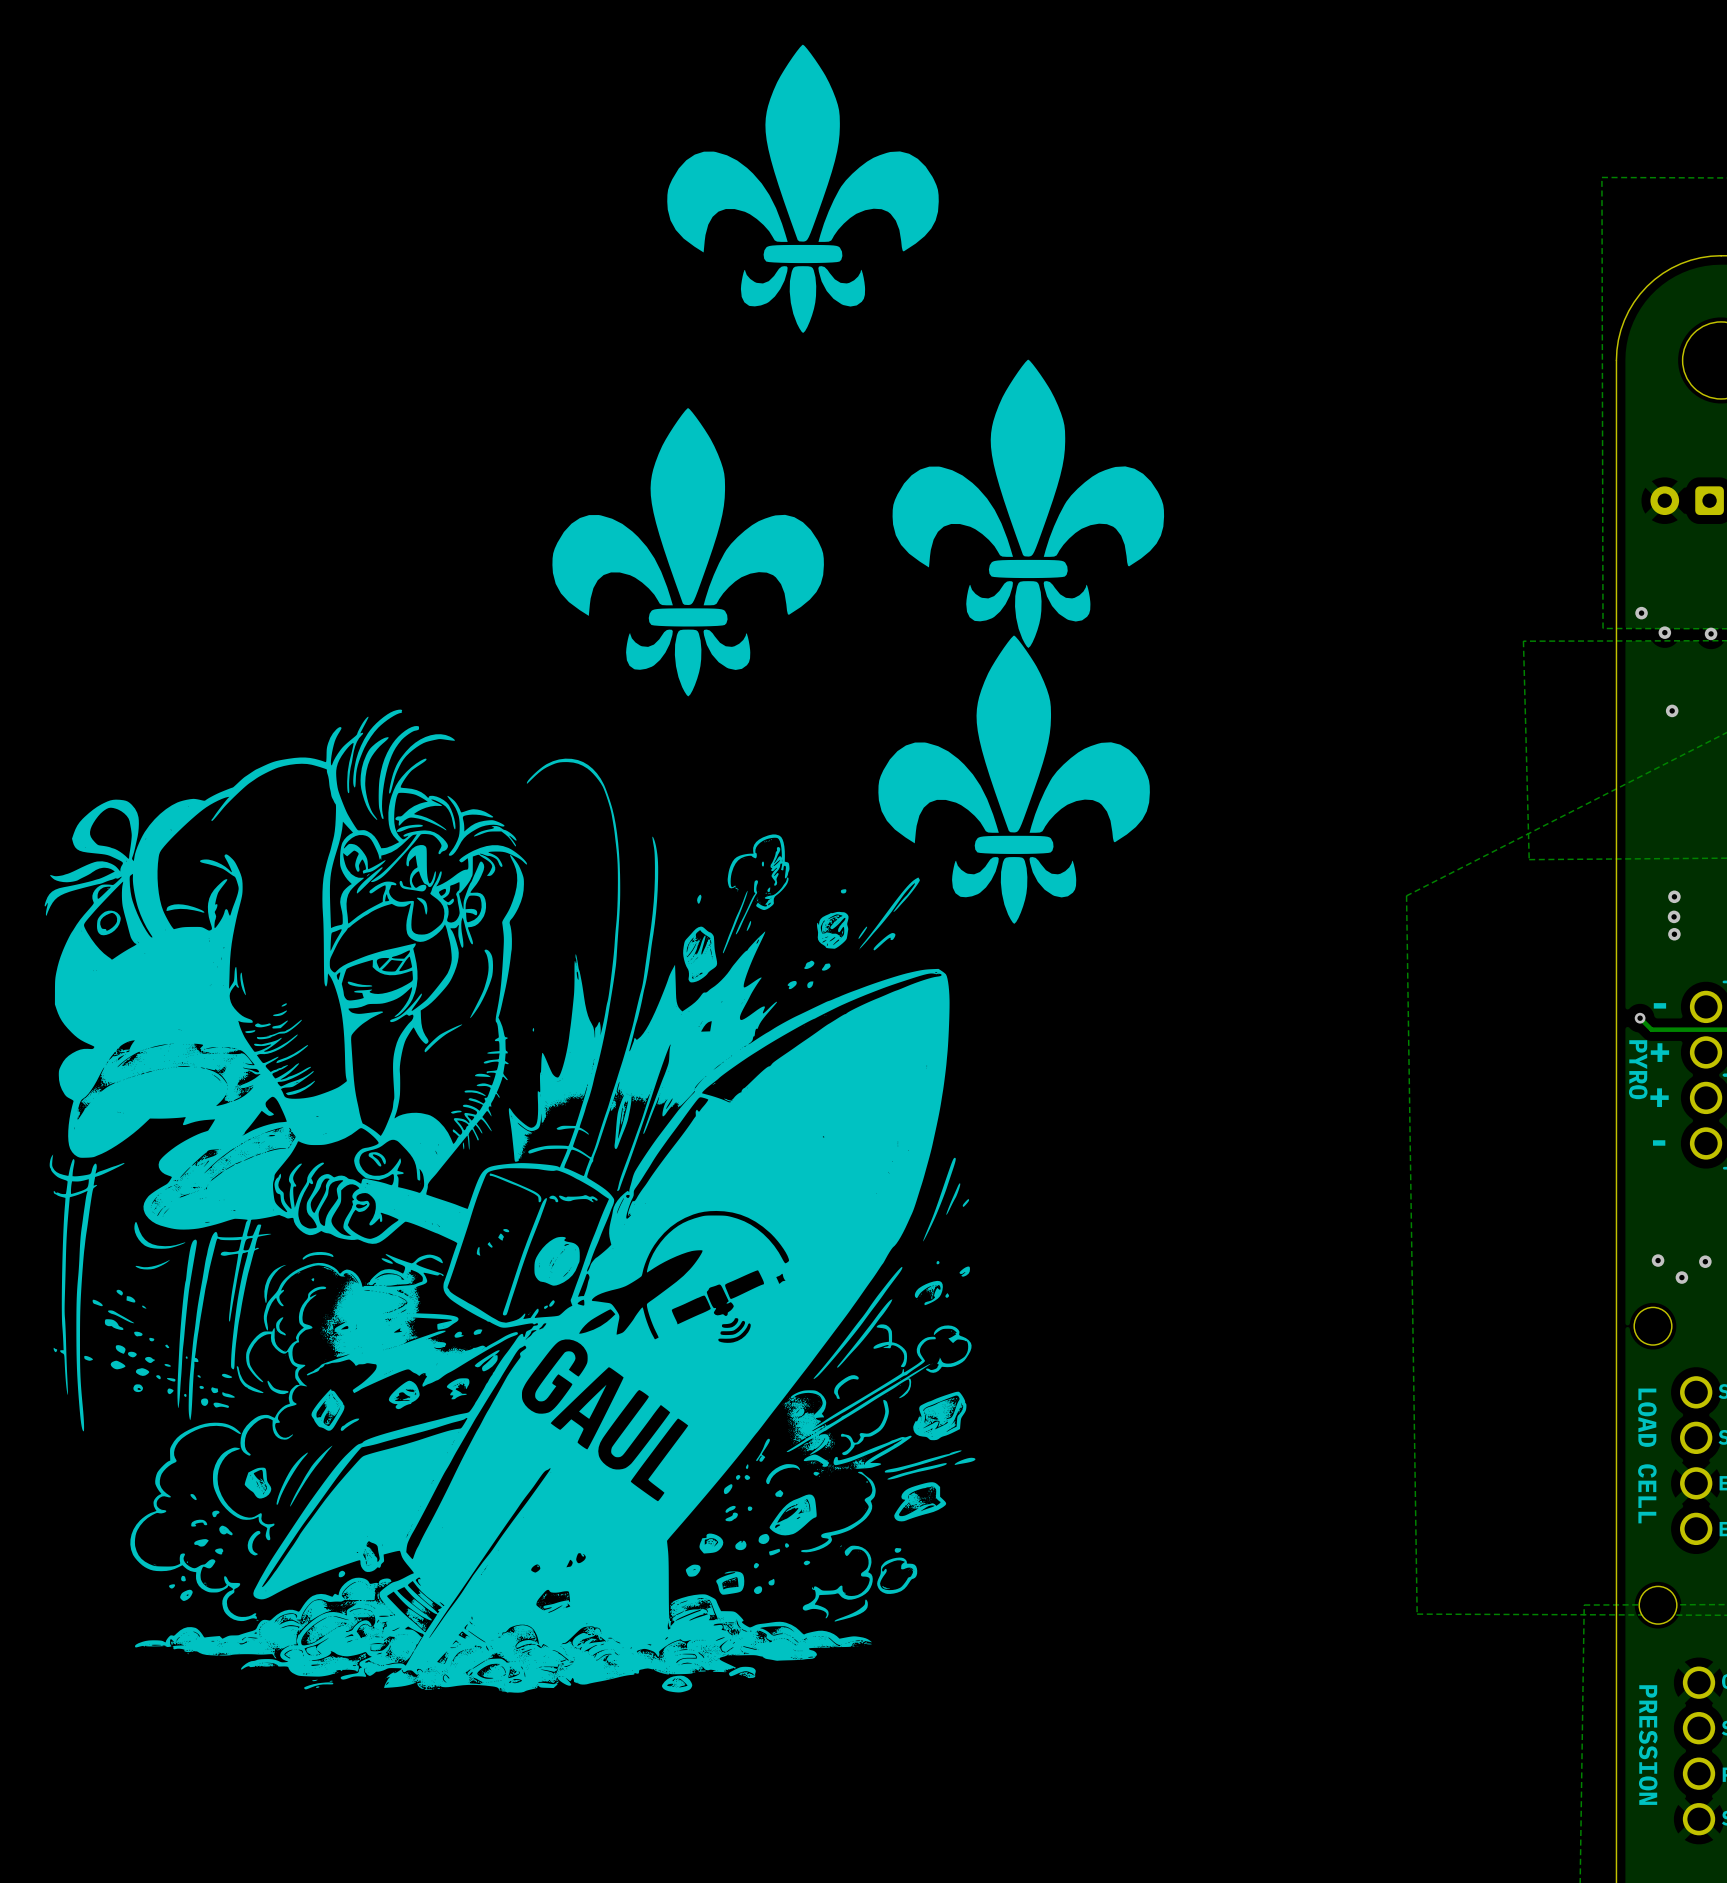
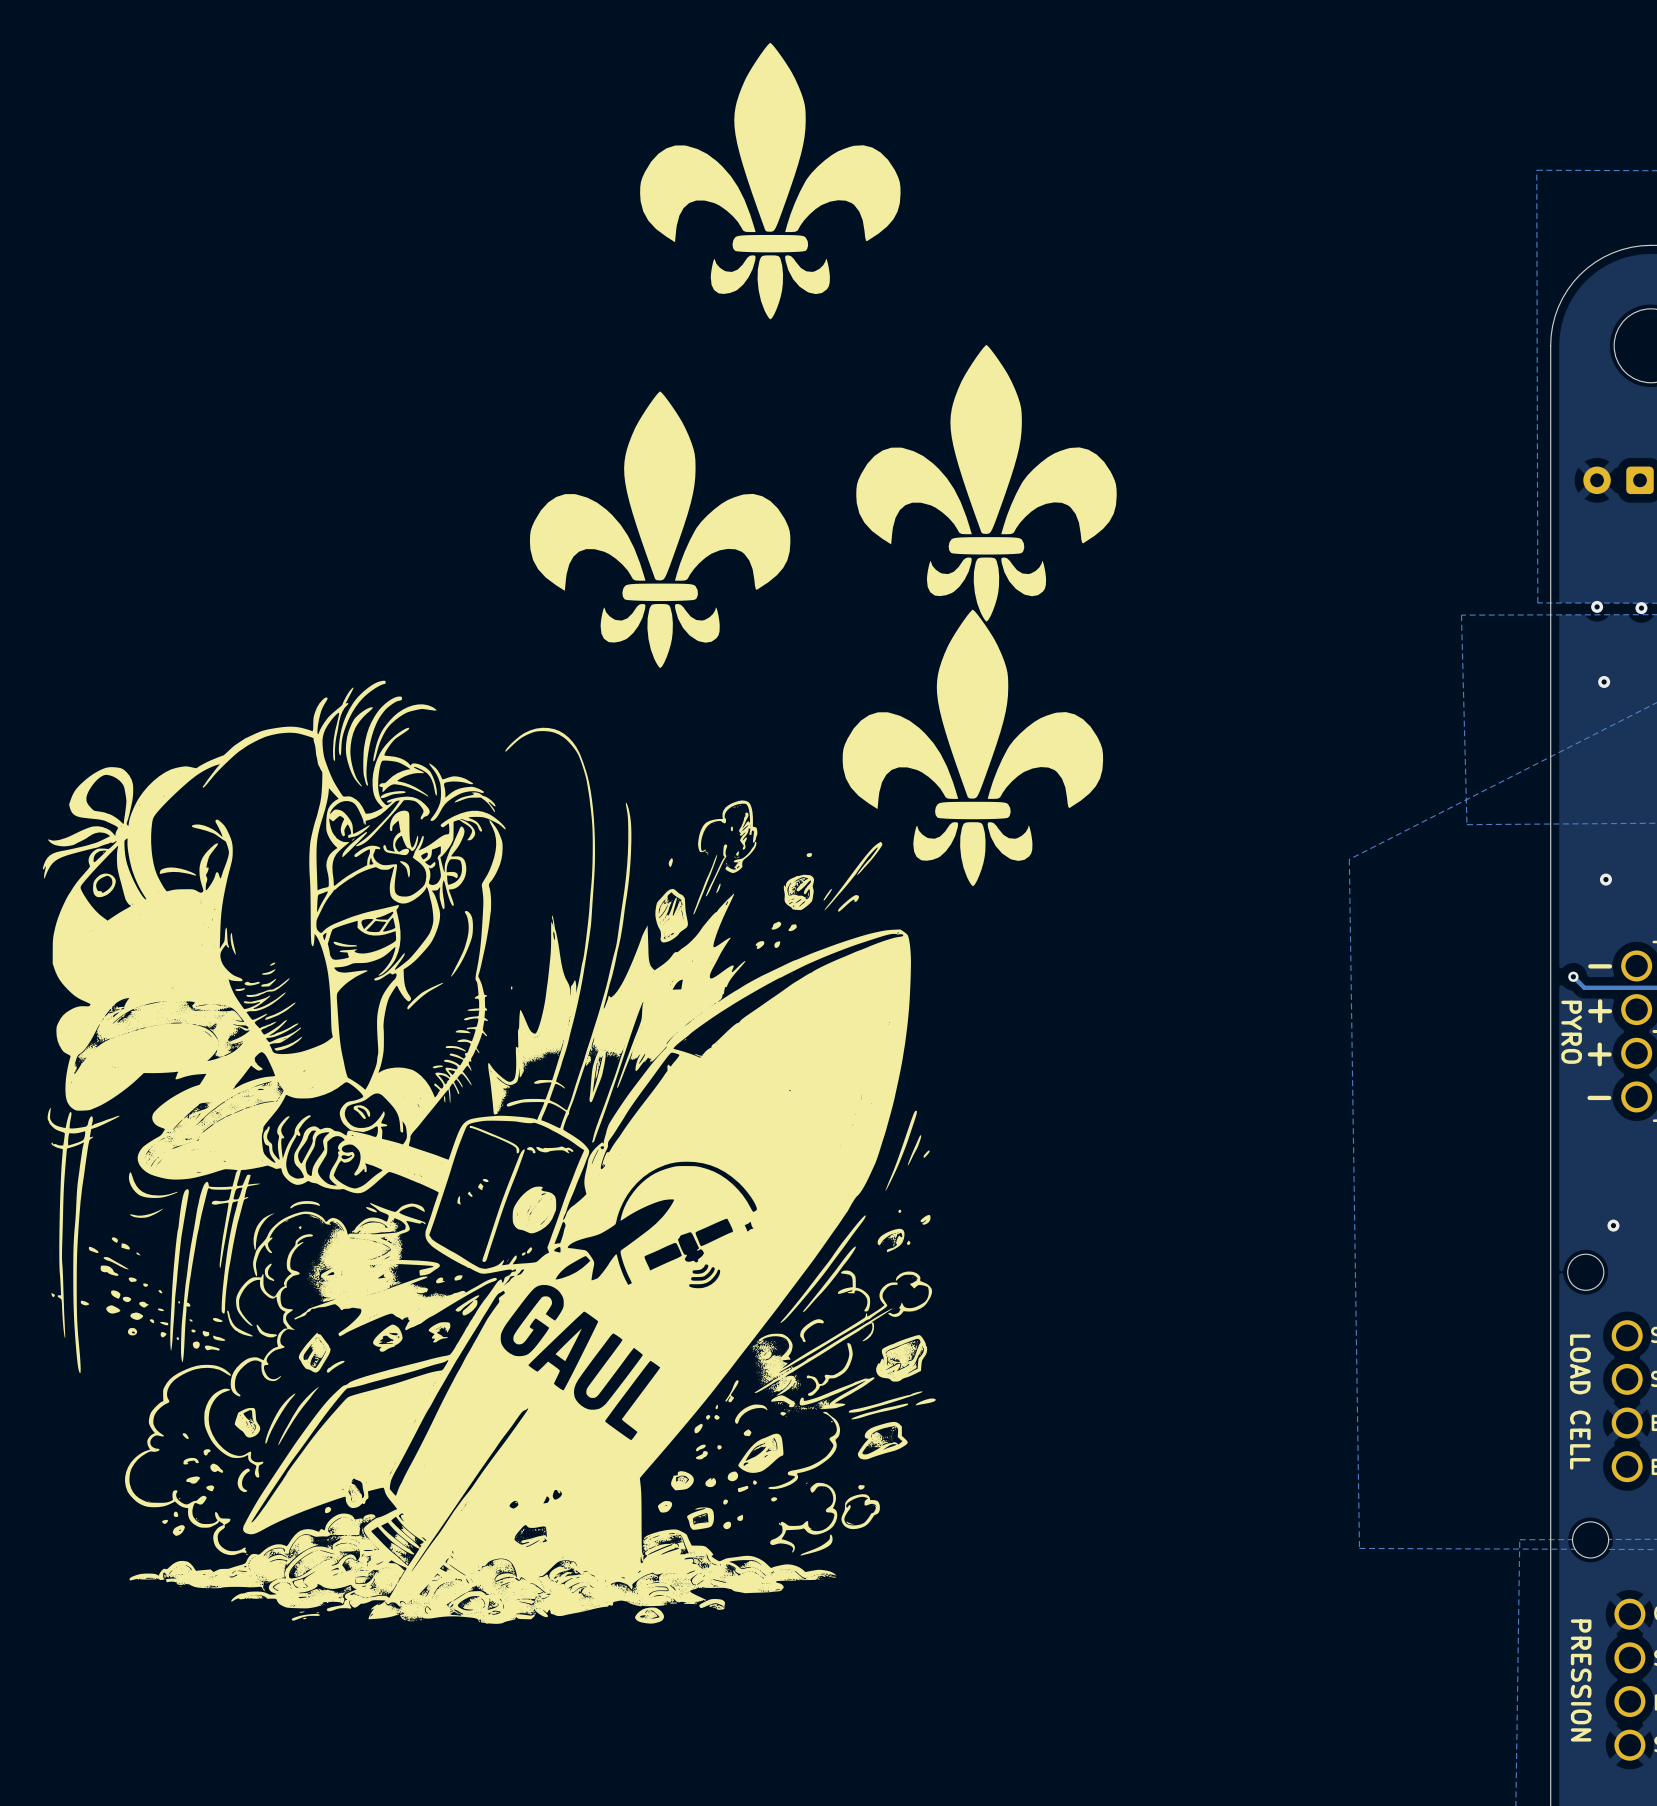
via: (1641, 613) -> none
via: (1674, 896) -> none
via: (1674, 934) -> none
via: (1658, 1260) -> none
via: (1705, 1261) -> none

